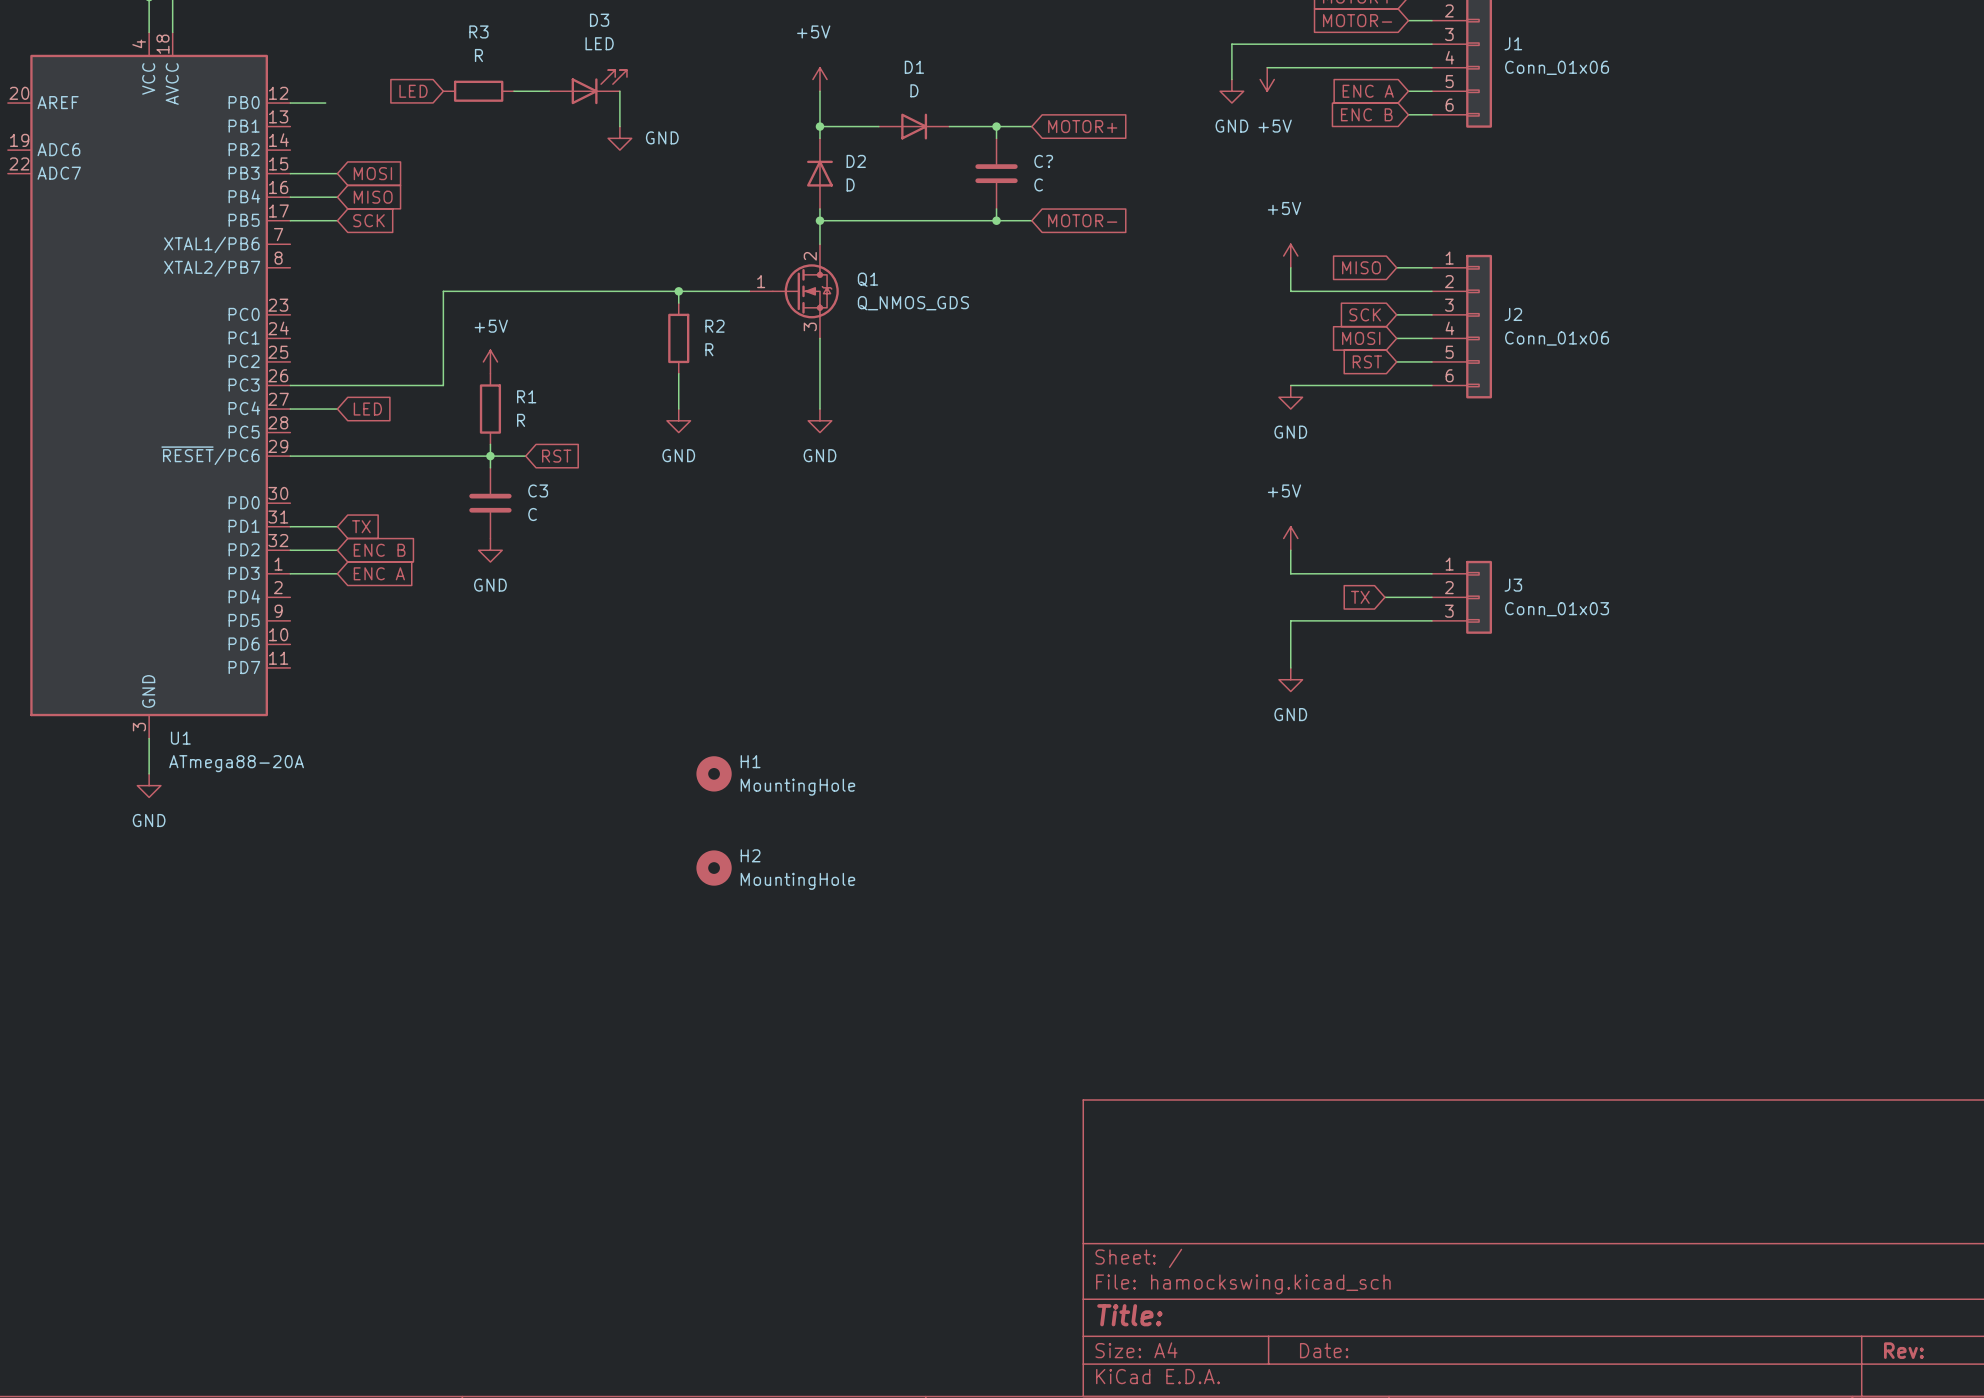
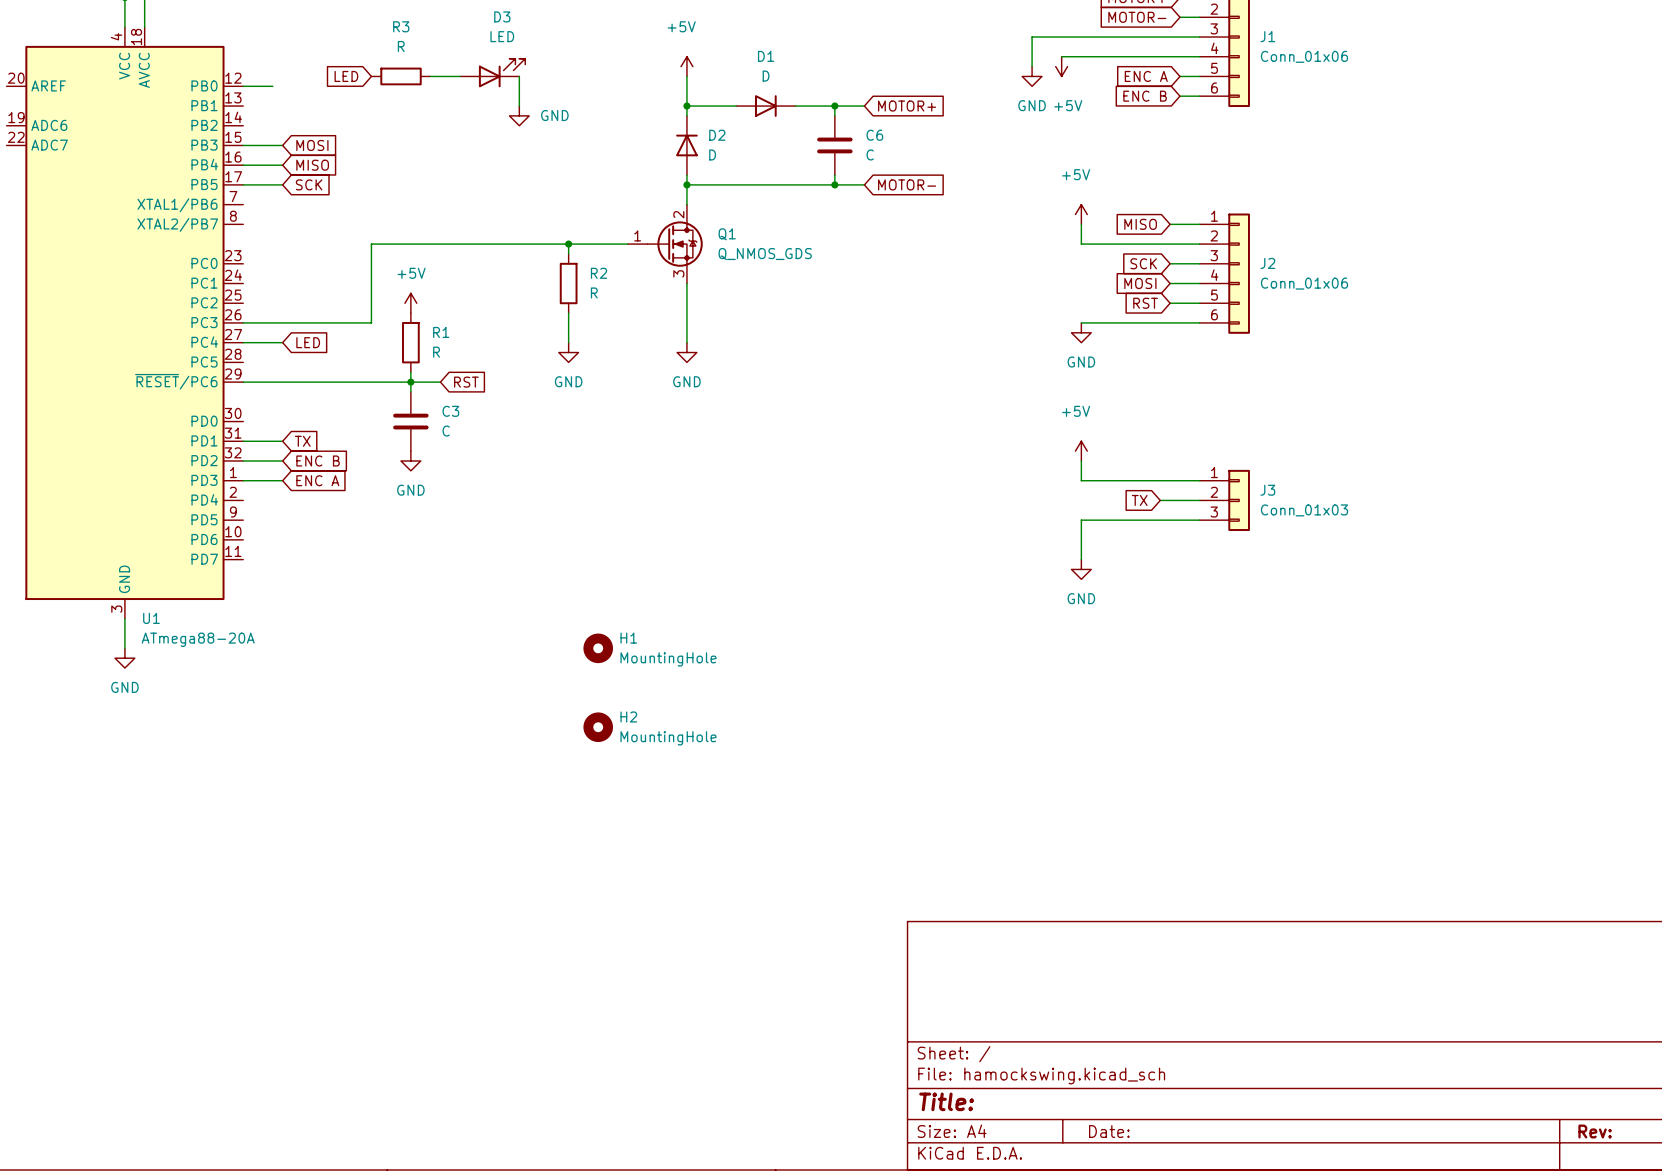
C? name: C? (1043, 161) -> C6 (874, 135)

